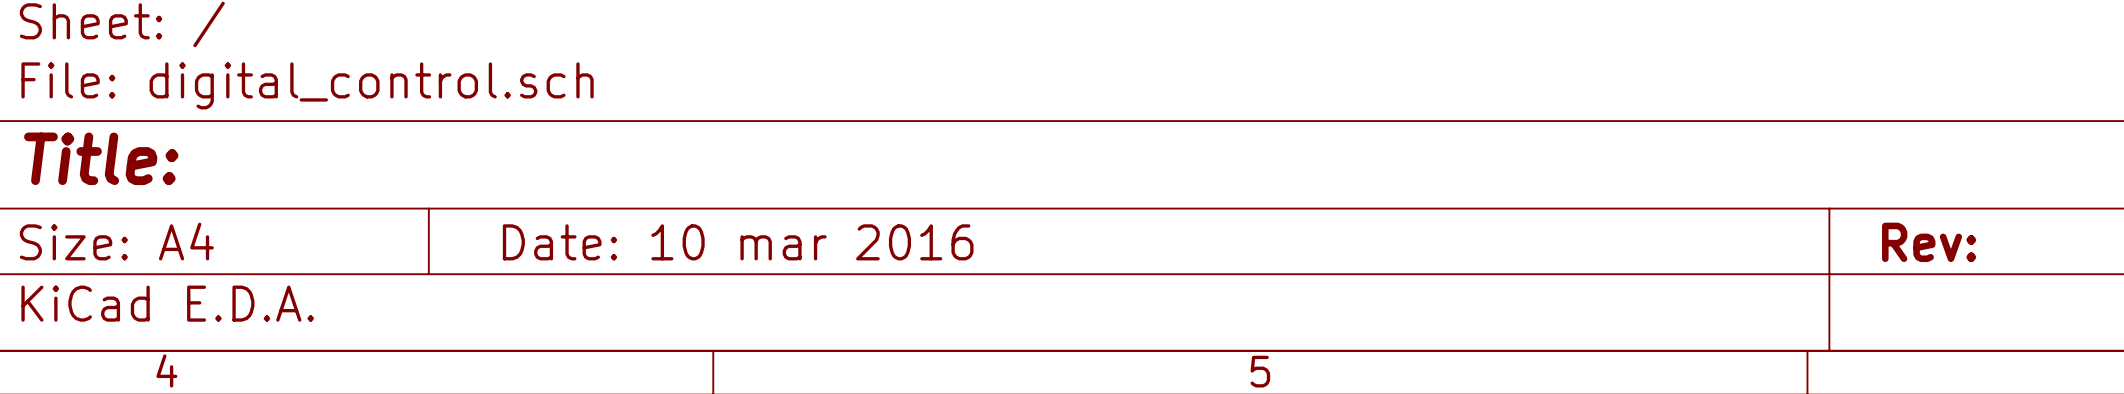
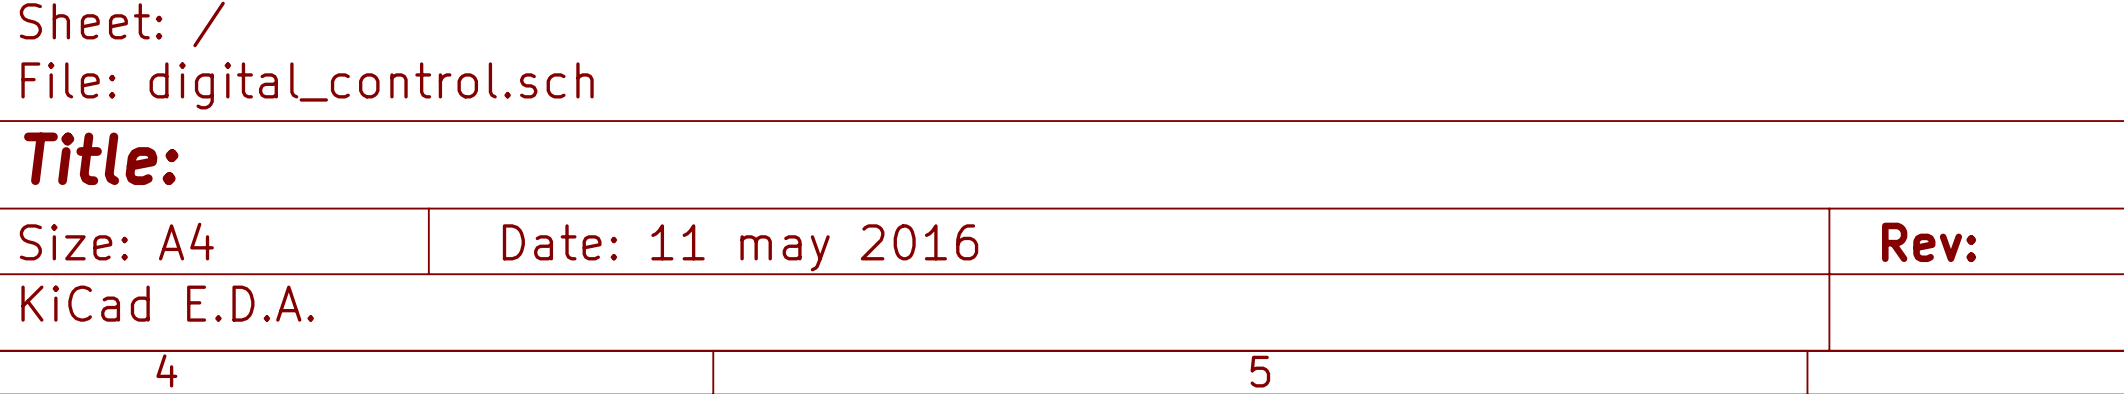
title block: Date: 10 mar 2016 (738, 242) -> Date: 11 may 2016 (740, 247)

